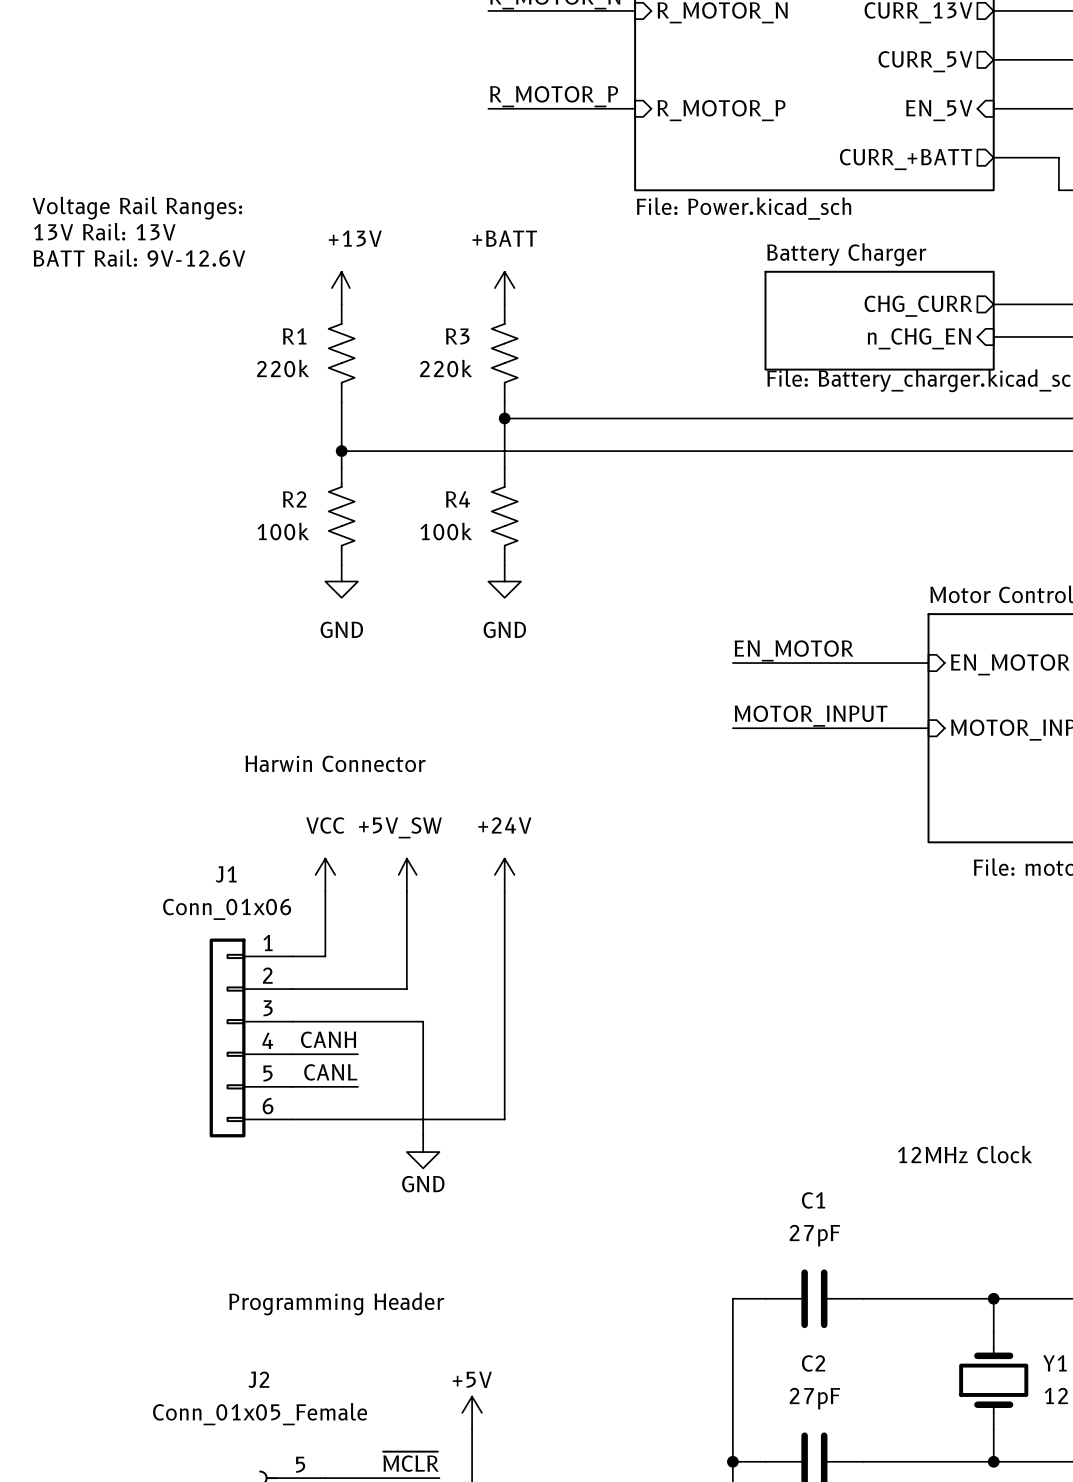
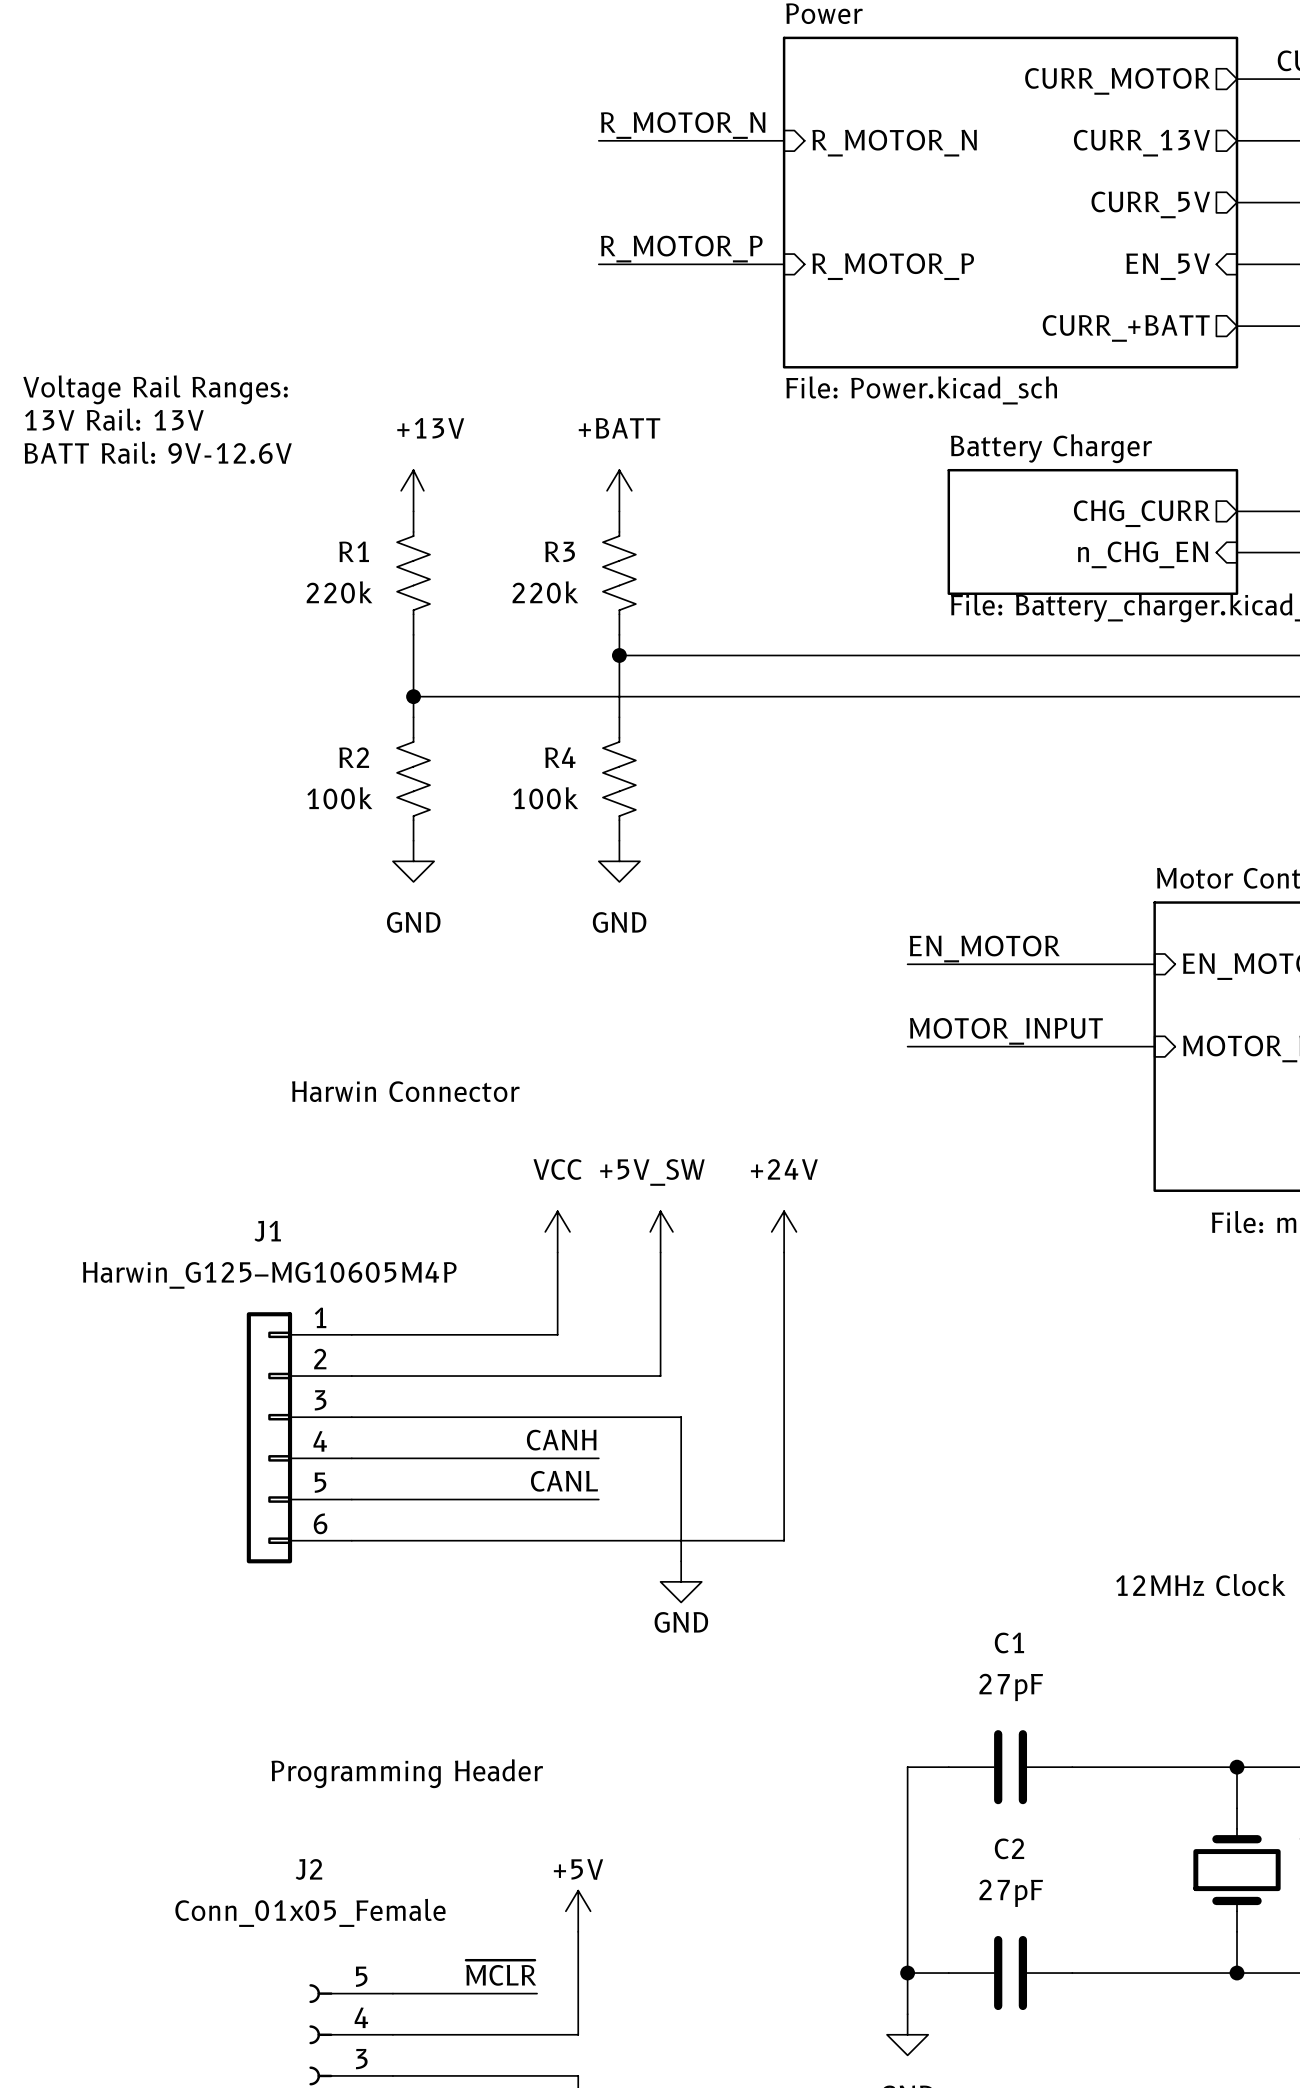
power symbol position: VCC (325, 874) -> VCC (557, 1231)
power symbol position: +5V_SW (407, 874) -> +5V_SW (661, 1231)
power symbol position: +24V (504, 874) -> +24V (784, 1231)
wire: (325, 891) (325, 956) -> (557, 1252) (557, 1334) (392, 1334)
wire: (406, 891) (406, 989) -> (660, 1252) (660, 1376) (495, 1376)
wire: (504, 891) (504, 1119) -> (784, 1252) (784, 1540) (619, 1540)
J1 value: Conn_01x06 (227, 909) -> Harwin_G125–MG10605M4P (269, 1275)
wire: (423, 1021) (423, 1135) -> (516, 1417) (681, 1417) (681, 1561)
label position: CANH (328, 1039) -> CANH (561, 1440)
wire: none -> (434, 1458) (598, 1458)
label position: CANL (330, 1072) -> CANL (564, 1481)
wire: none -> (434, 1499) (598, 1499)
power symbol position: GND (423, 1152) -> GND (681, 1581)

